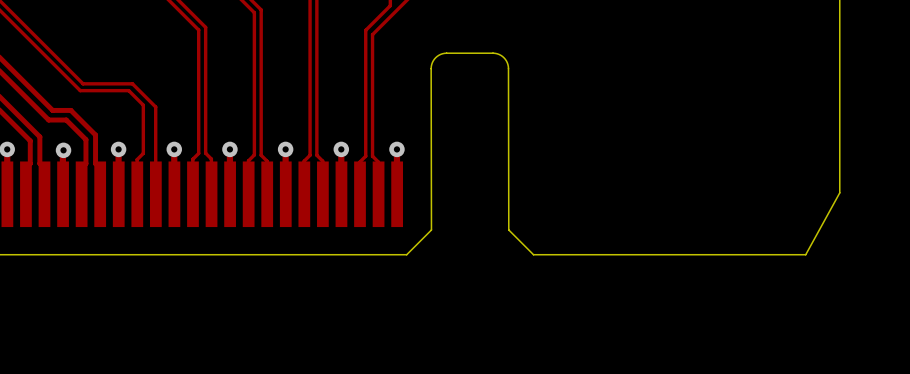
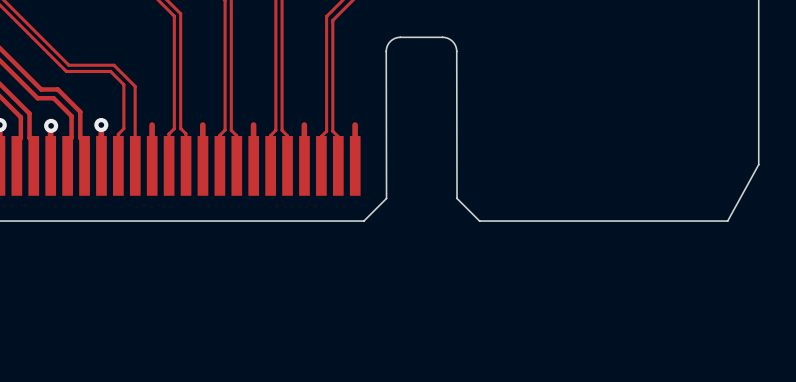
via: (174, 149) -> none
via: (229, 149) -> none
via: (285, 149) -> none
via: (341, 149) -> none
via: (396, 149) -> none

